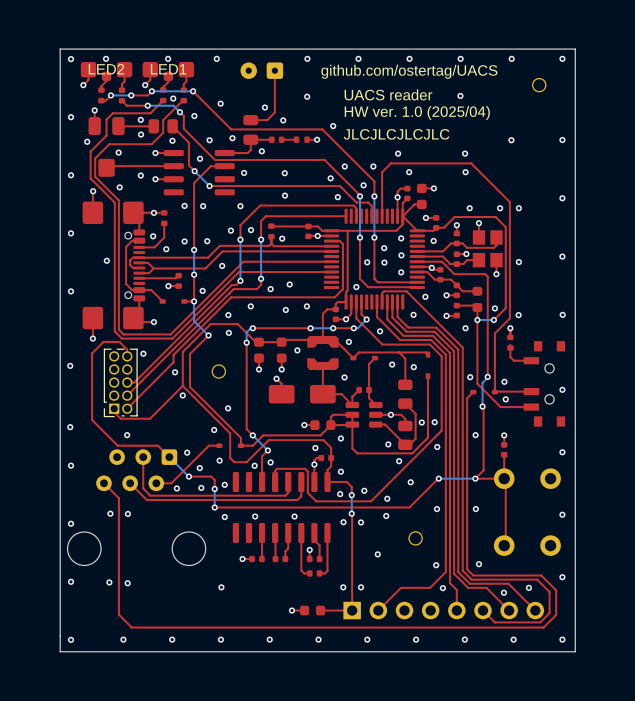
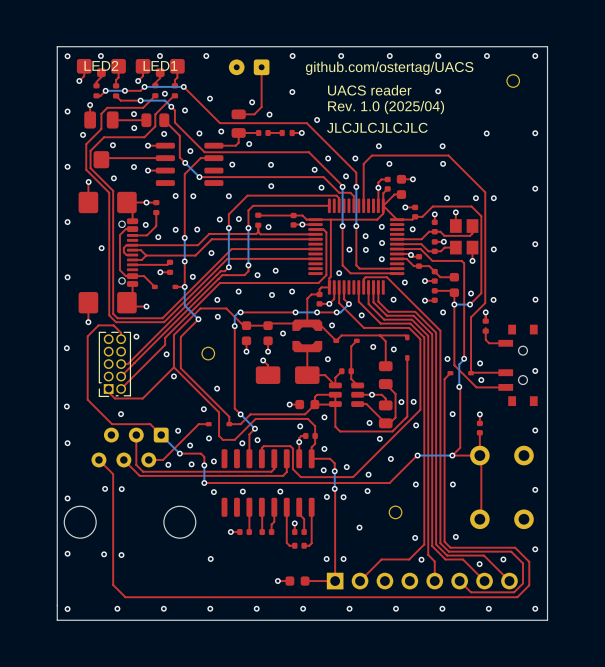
text: HW ver. 1.0 (2025/04) (417, 112) -> Rev. 1.0 (2025/04) (386, 107)

